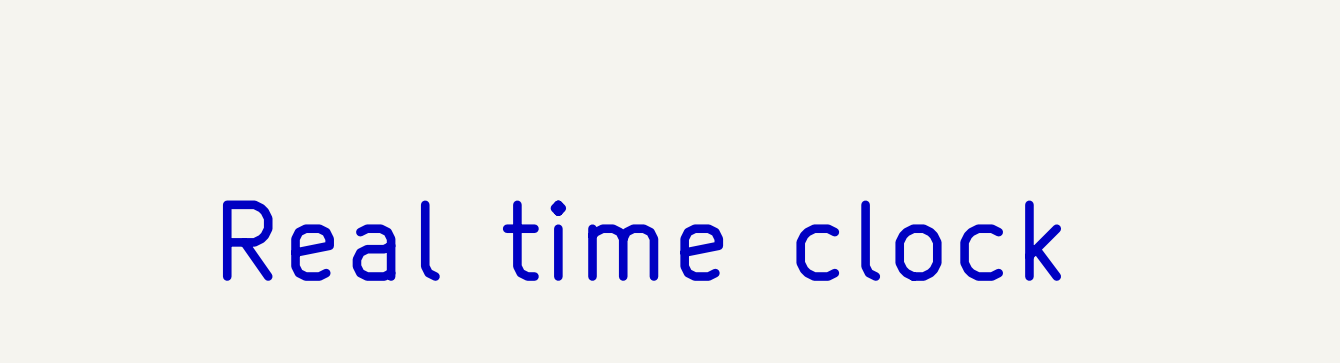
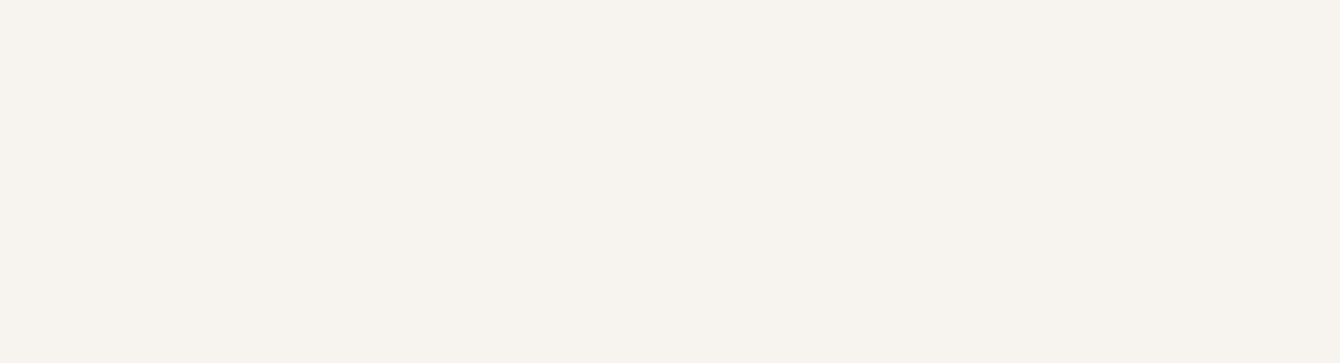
text: Real time clock (642, 240) -> none

